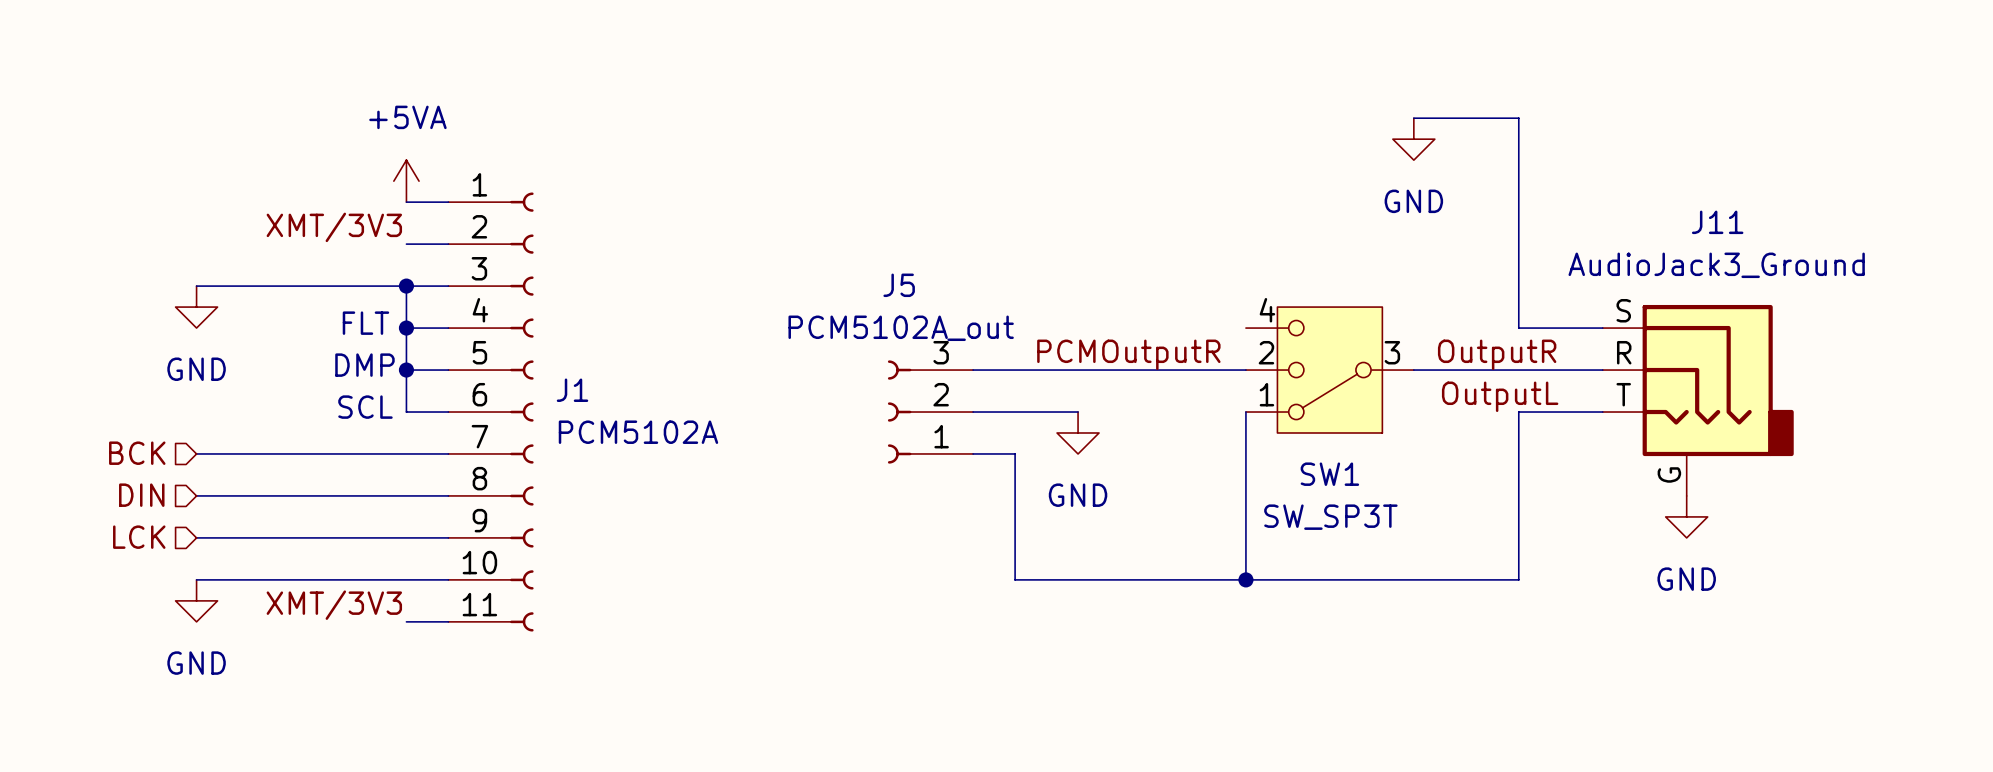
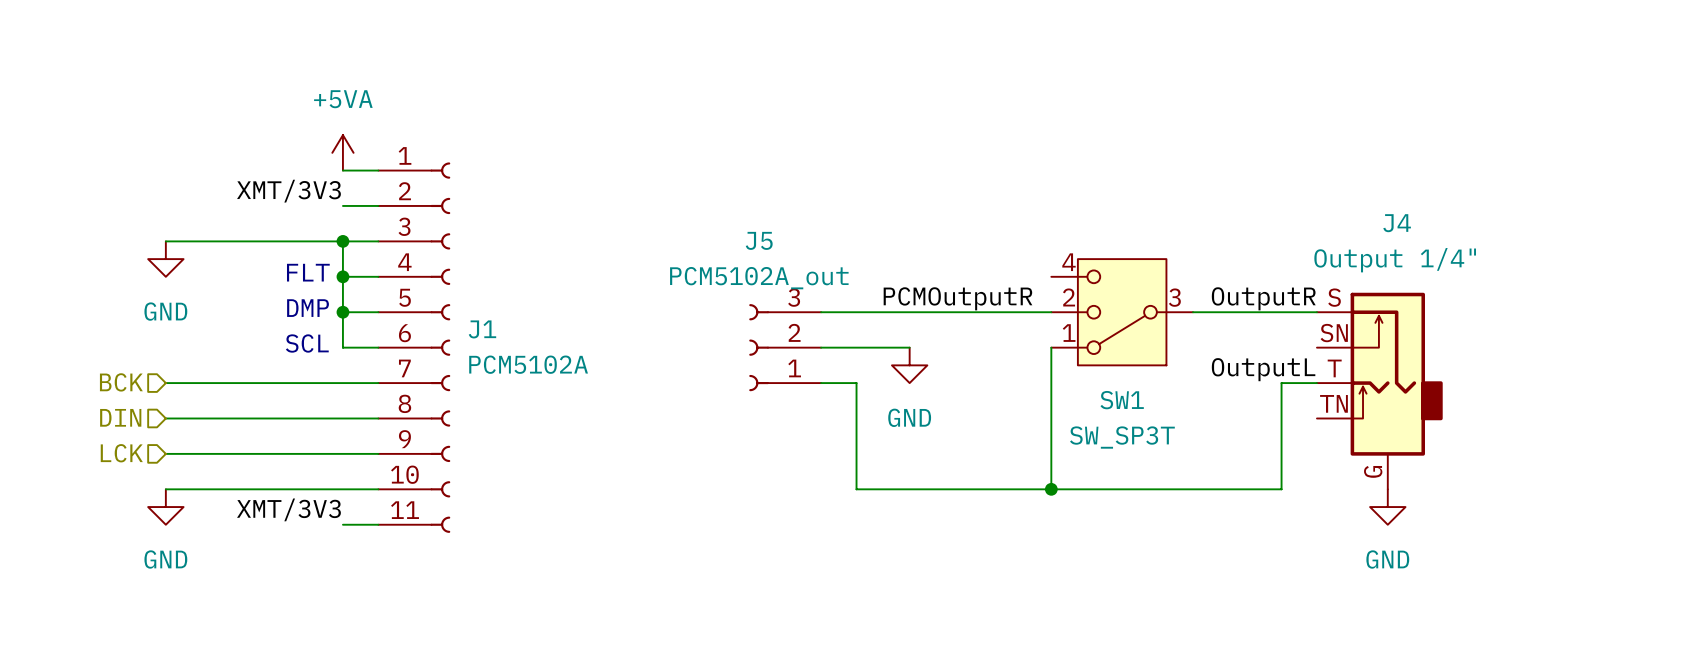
wire: (1413, 118) (1518, 118) (1518, 328) (1602, 328) -> none
power symbol: GND (1413, 139) -> none
label position: OutputL (1500, 396) -> OutputL (1263, 369)
J11: AudioJack3_Ground (1698, 400) -> none
wire: (1602, 412) (1518, 412) (1518, 453) -> (1316, 383) (1281, 383)
J4: none -> Output 1/4" (1379, 391)
power symbol position: GND (1686, 516) -> GND (1387, 507)

